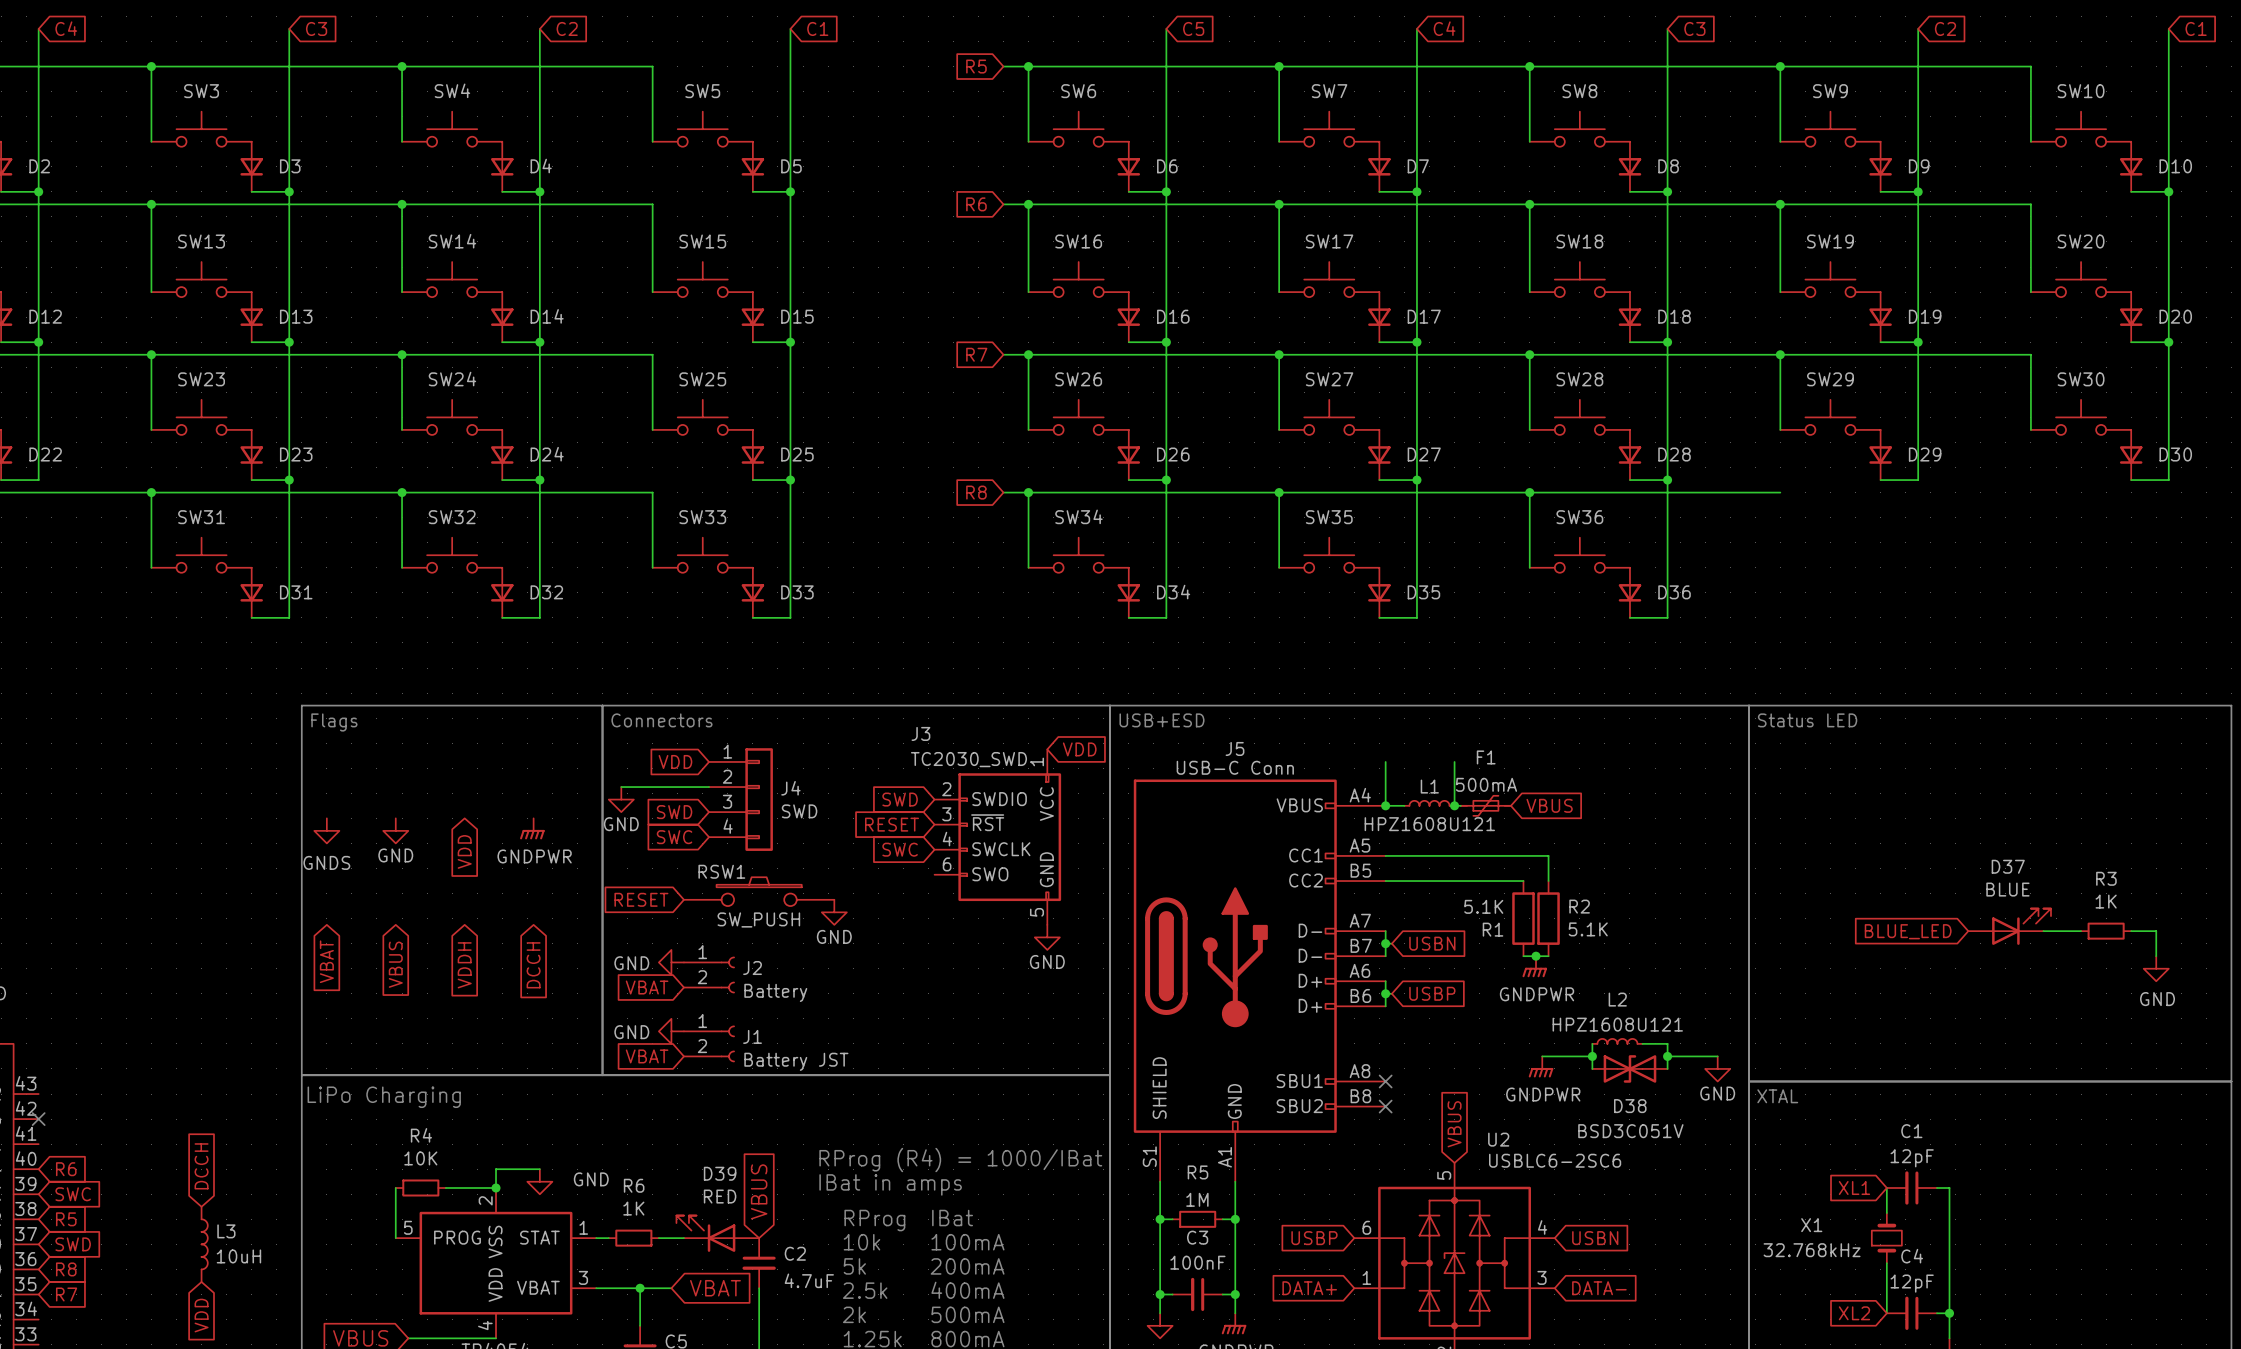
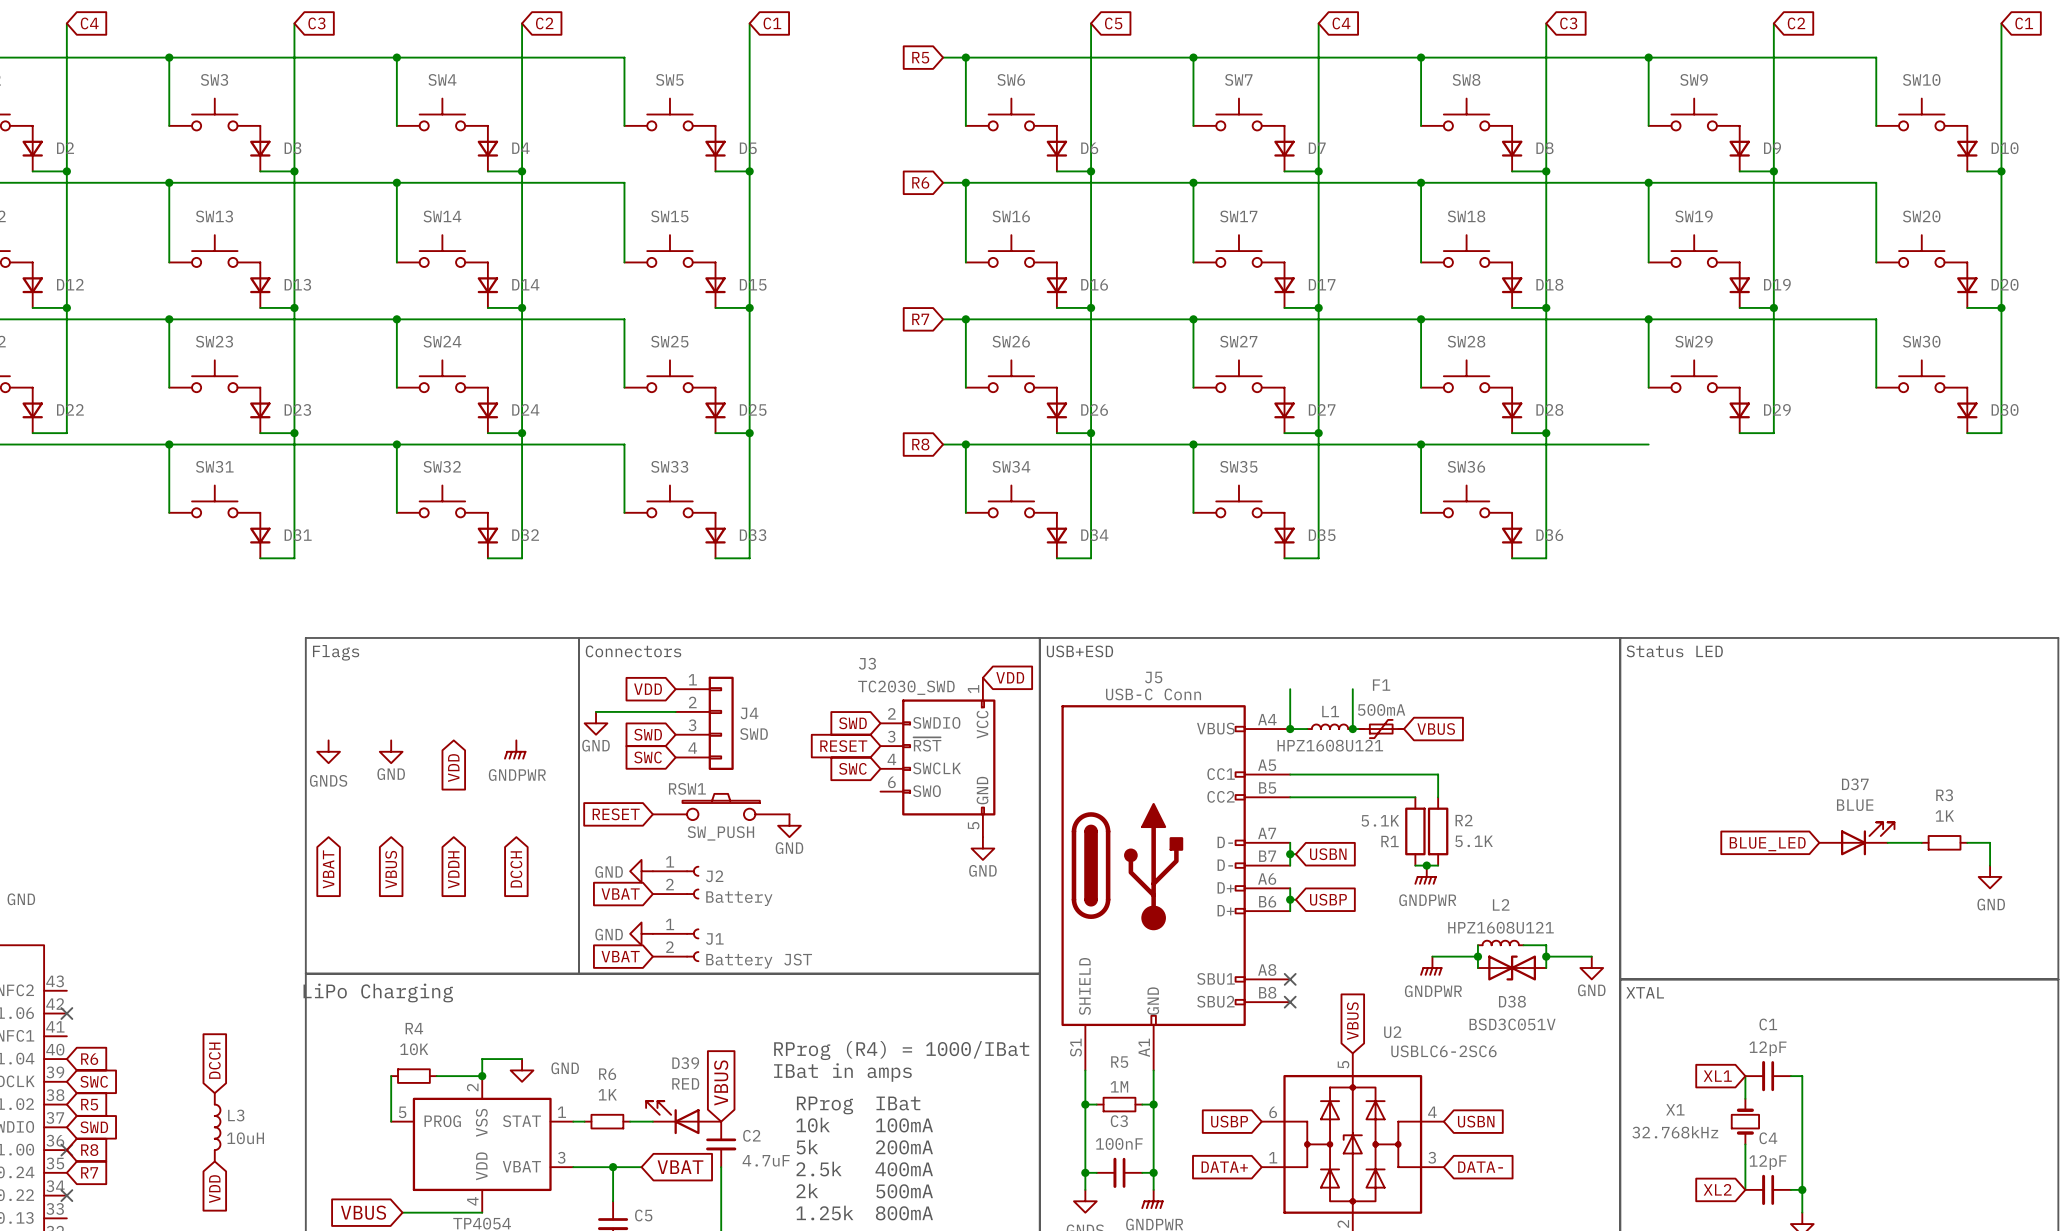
no-connect mark: none -> (66, 1150)
no-connect mark: none -> (66, 1195)

